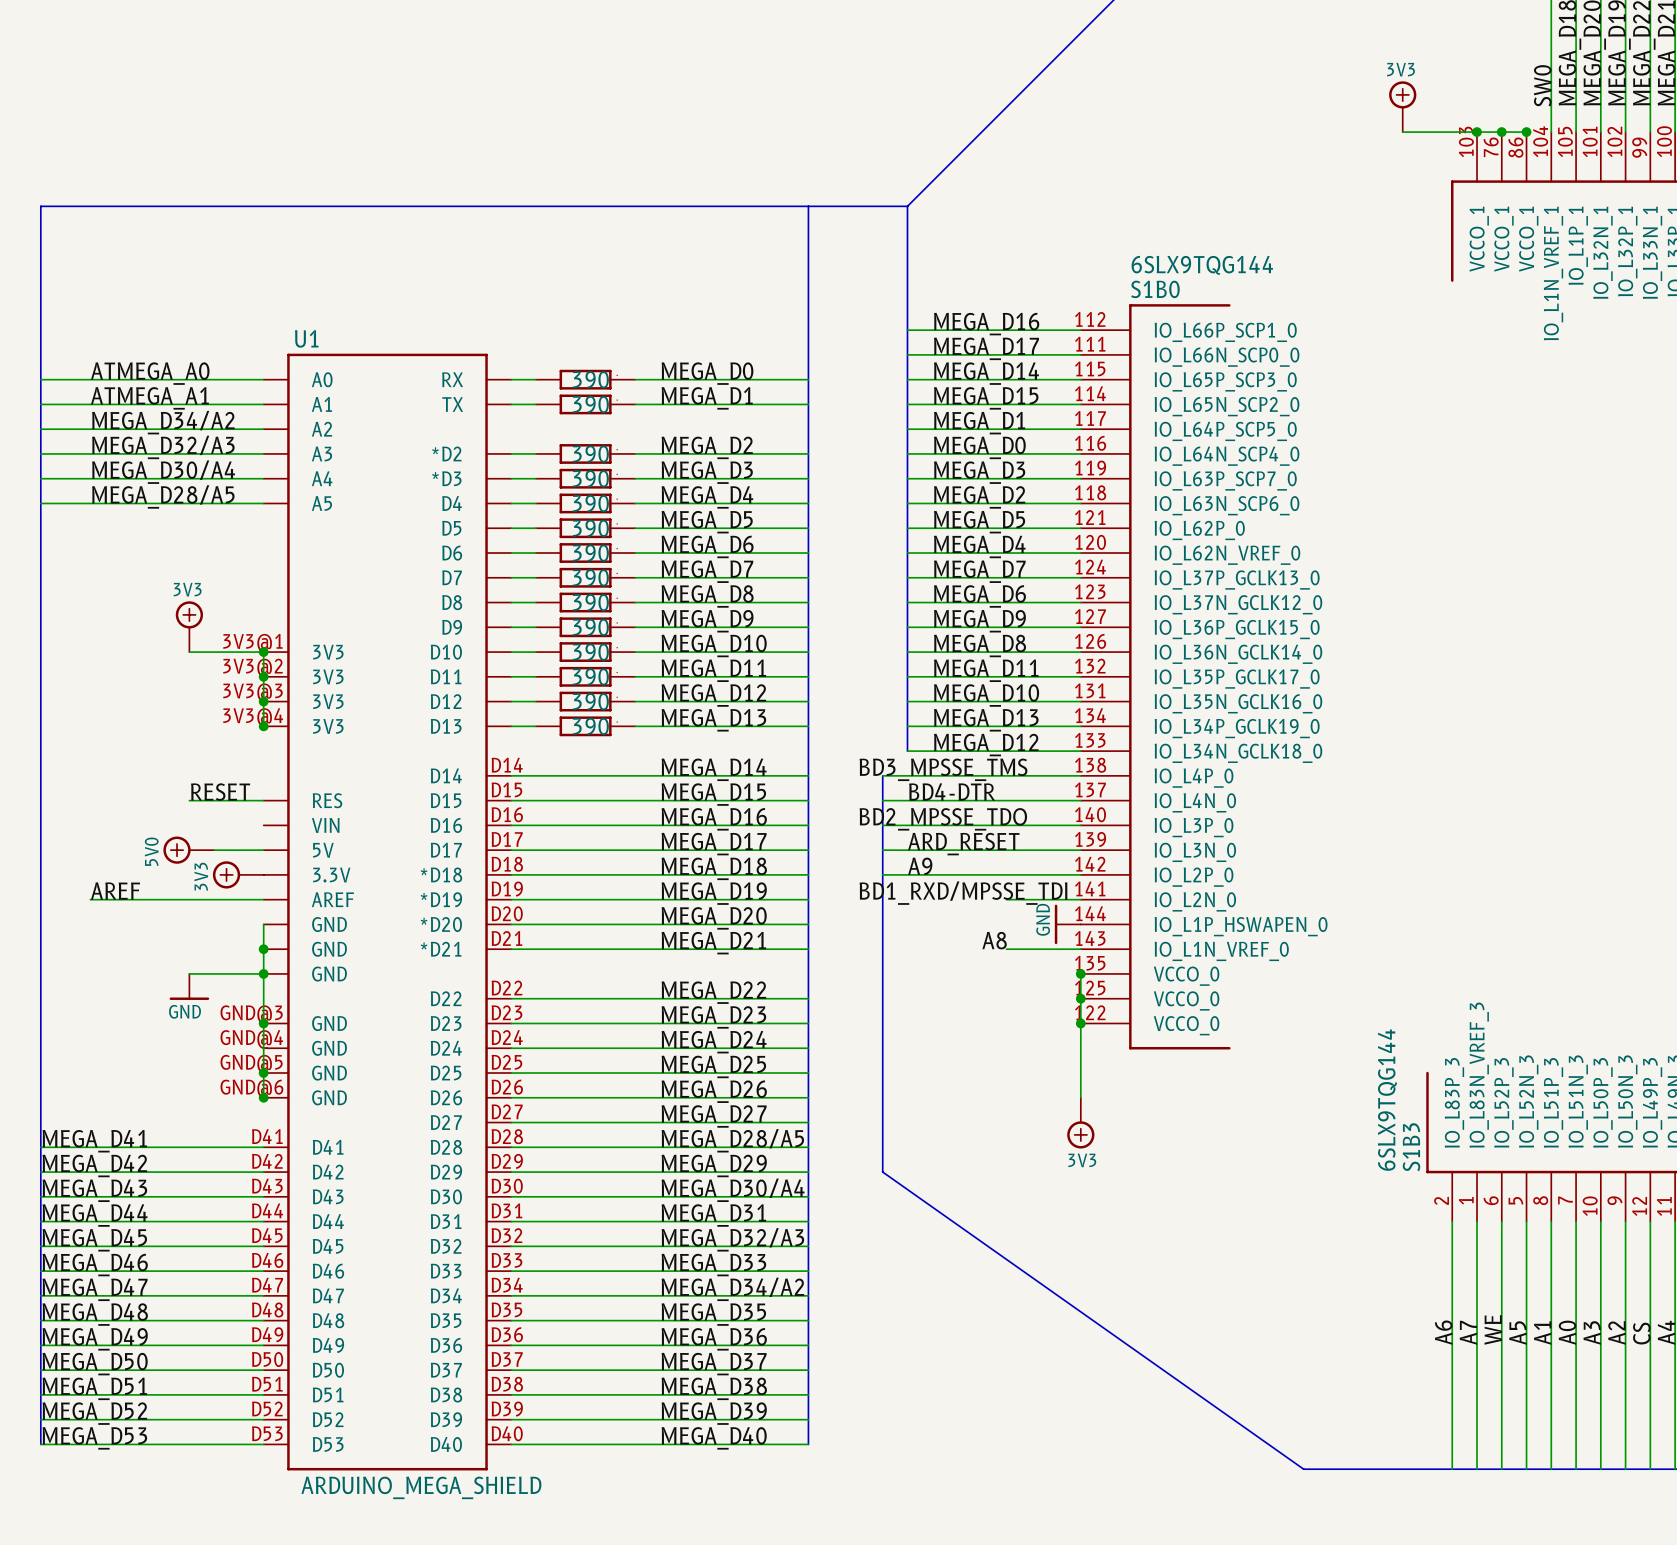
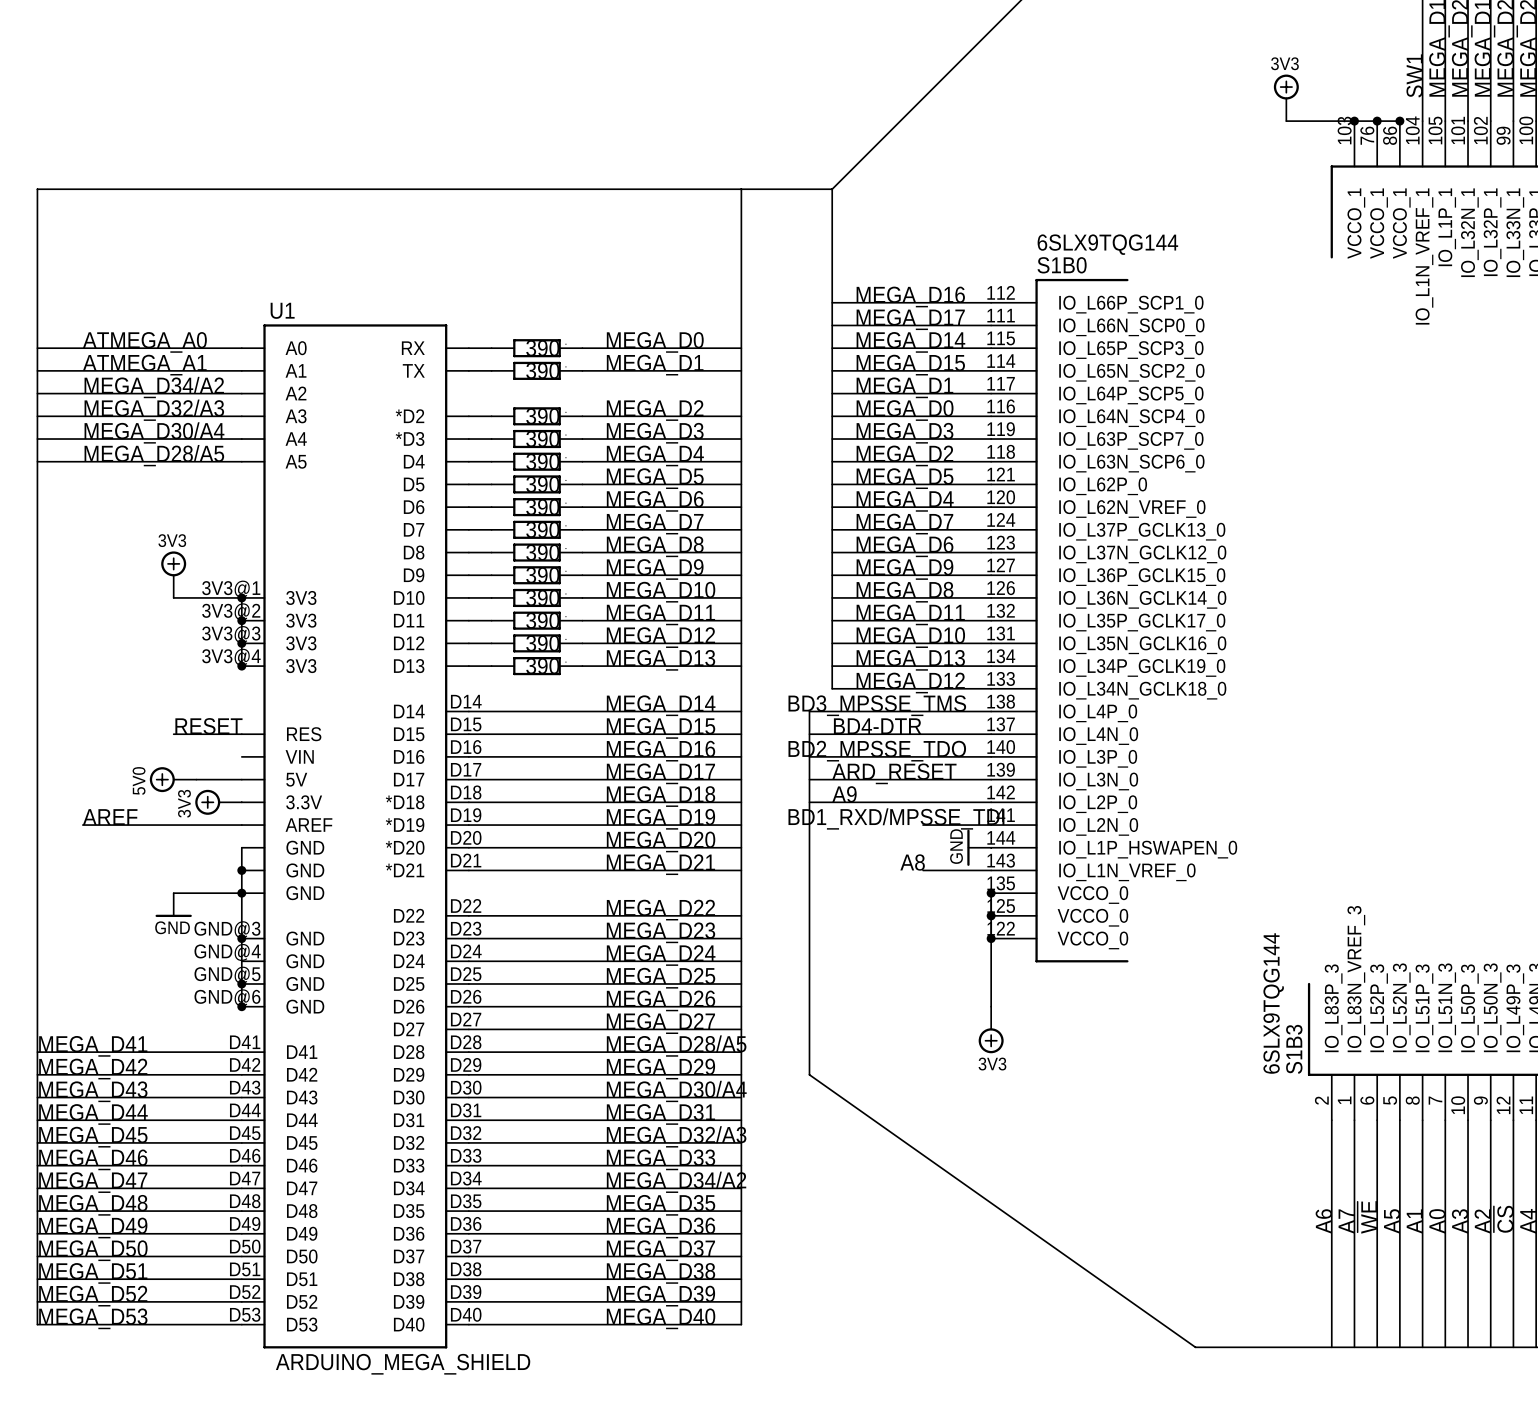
label: SW0 (1542, 85) -> SW1 (1414, 75)
label: WE (1493, 1329) -> ~{WE} (1367, 1217)
label: CS (1641, 1333) -> ~{CS} (1503, 1219)

